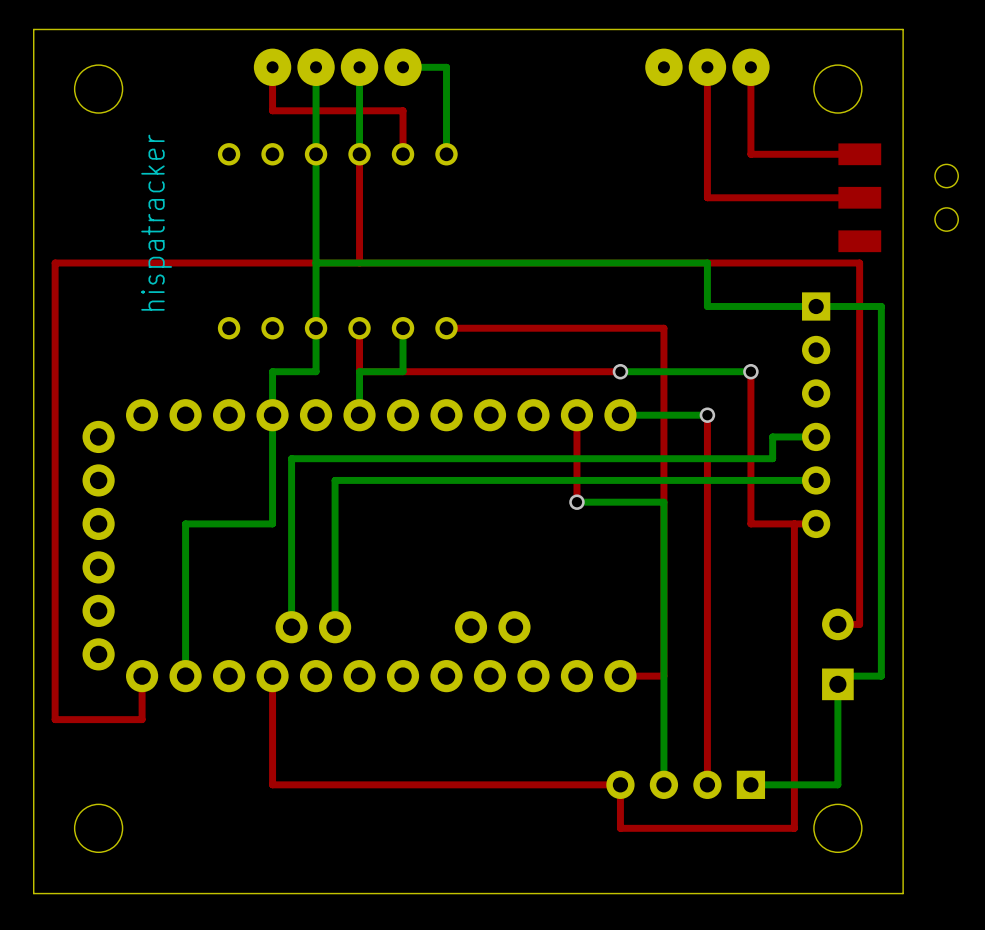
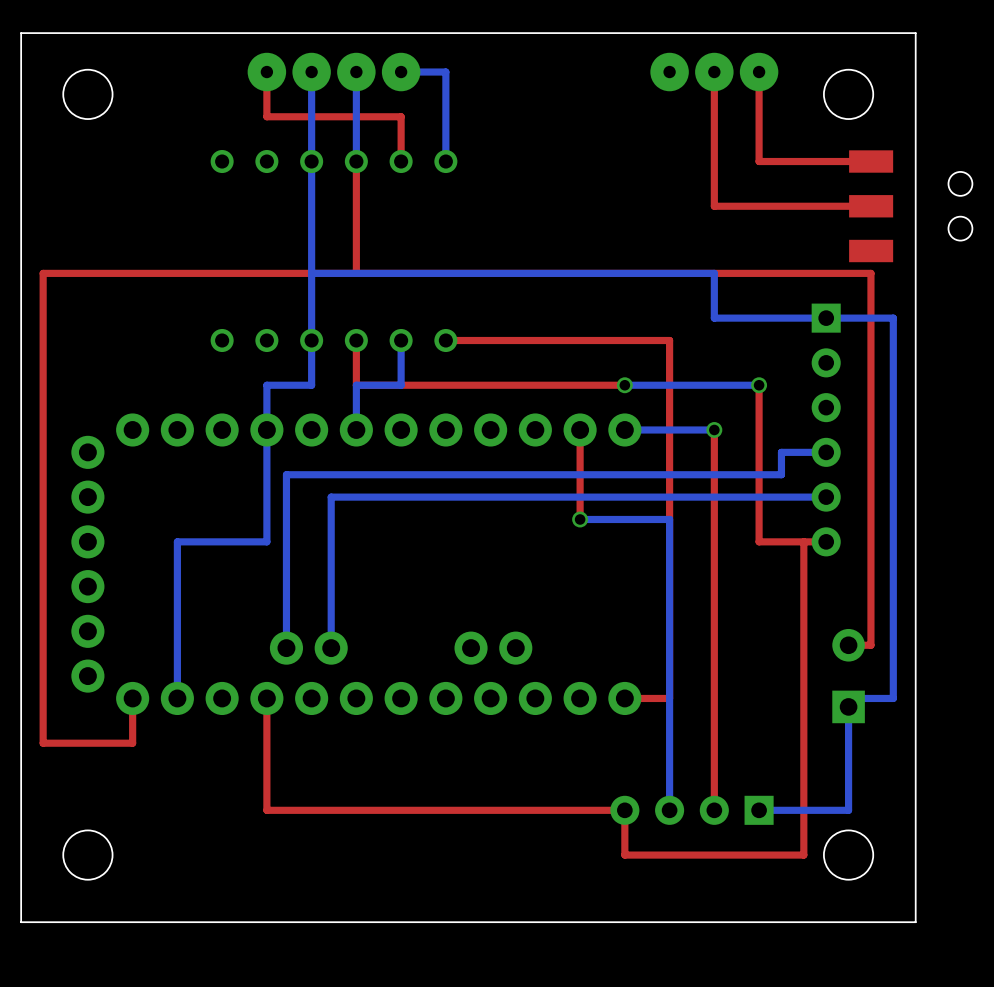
text: hispatracker (156, 222) -> none

